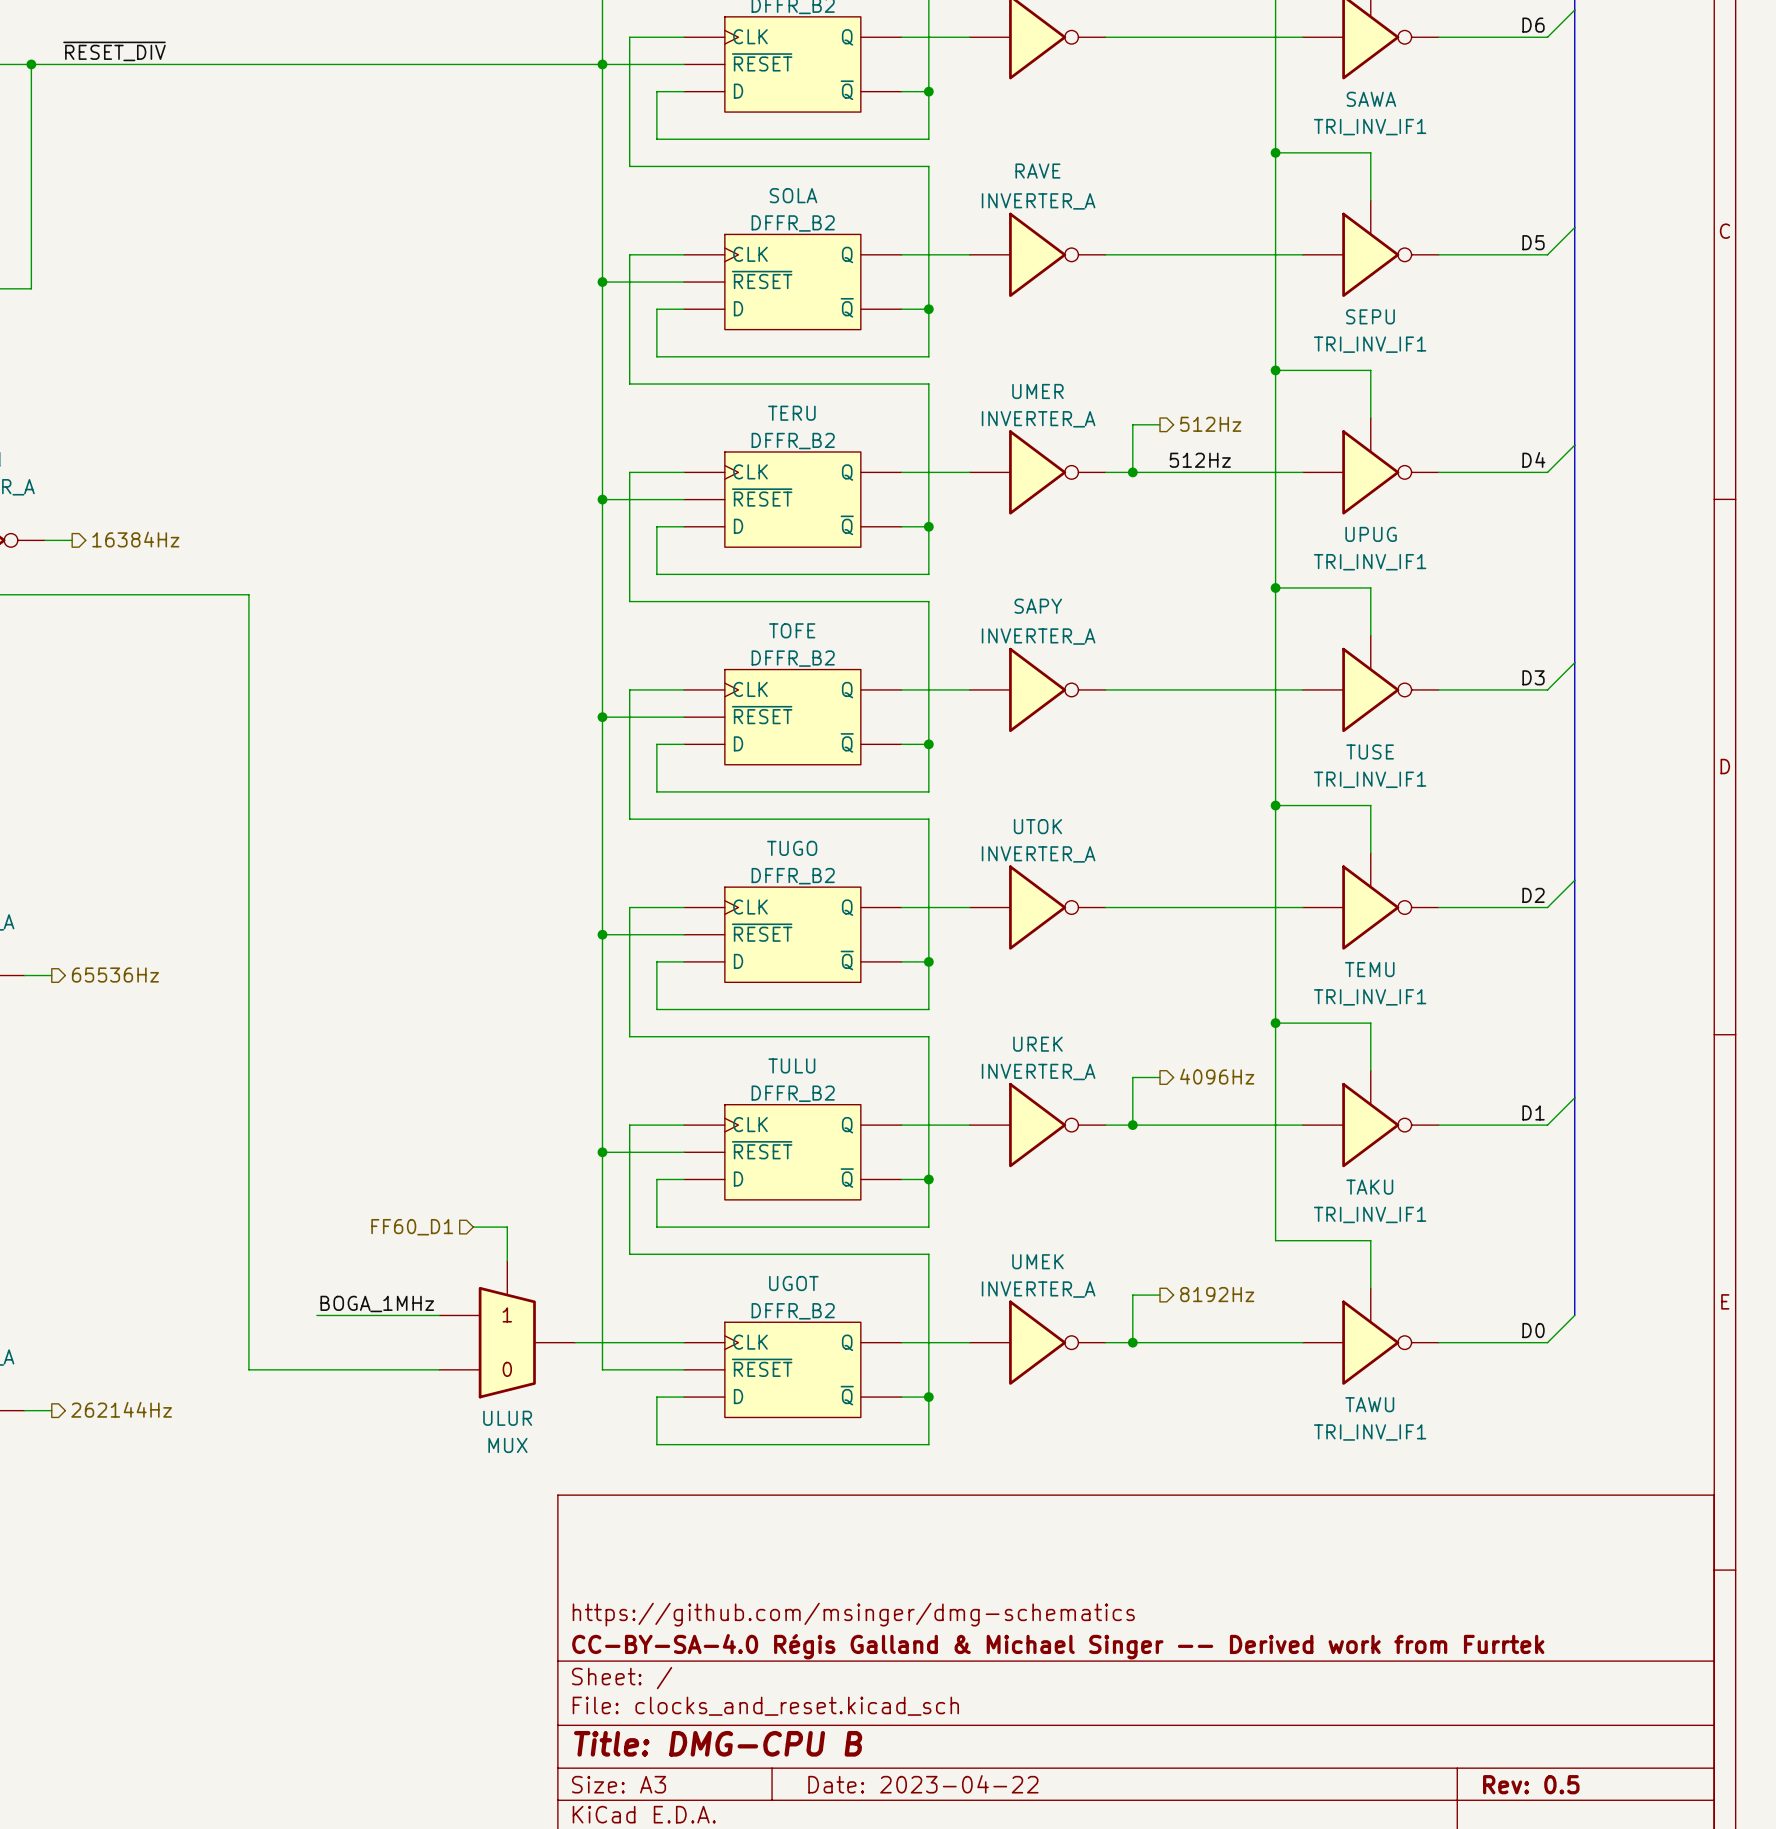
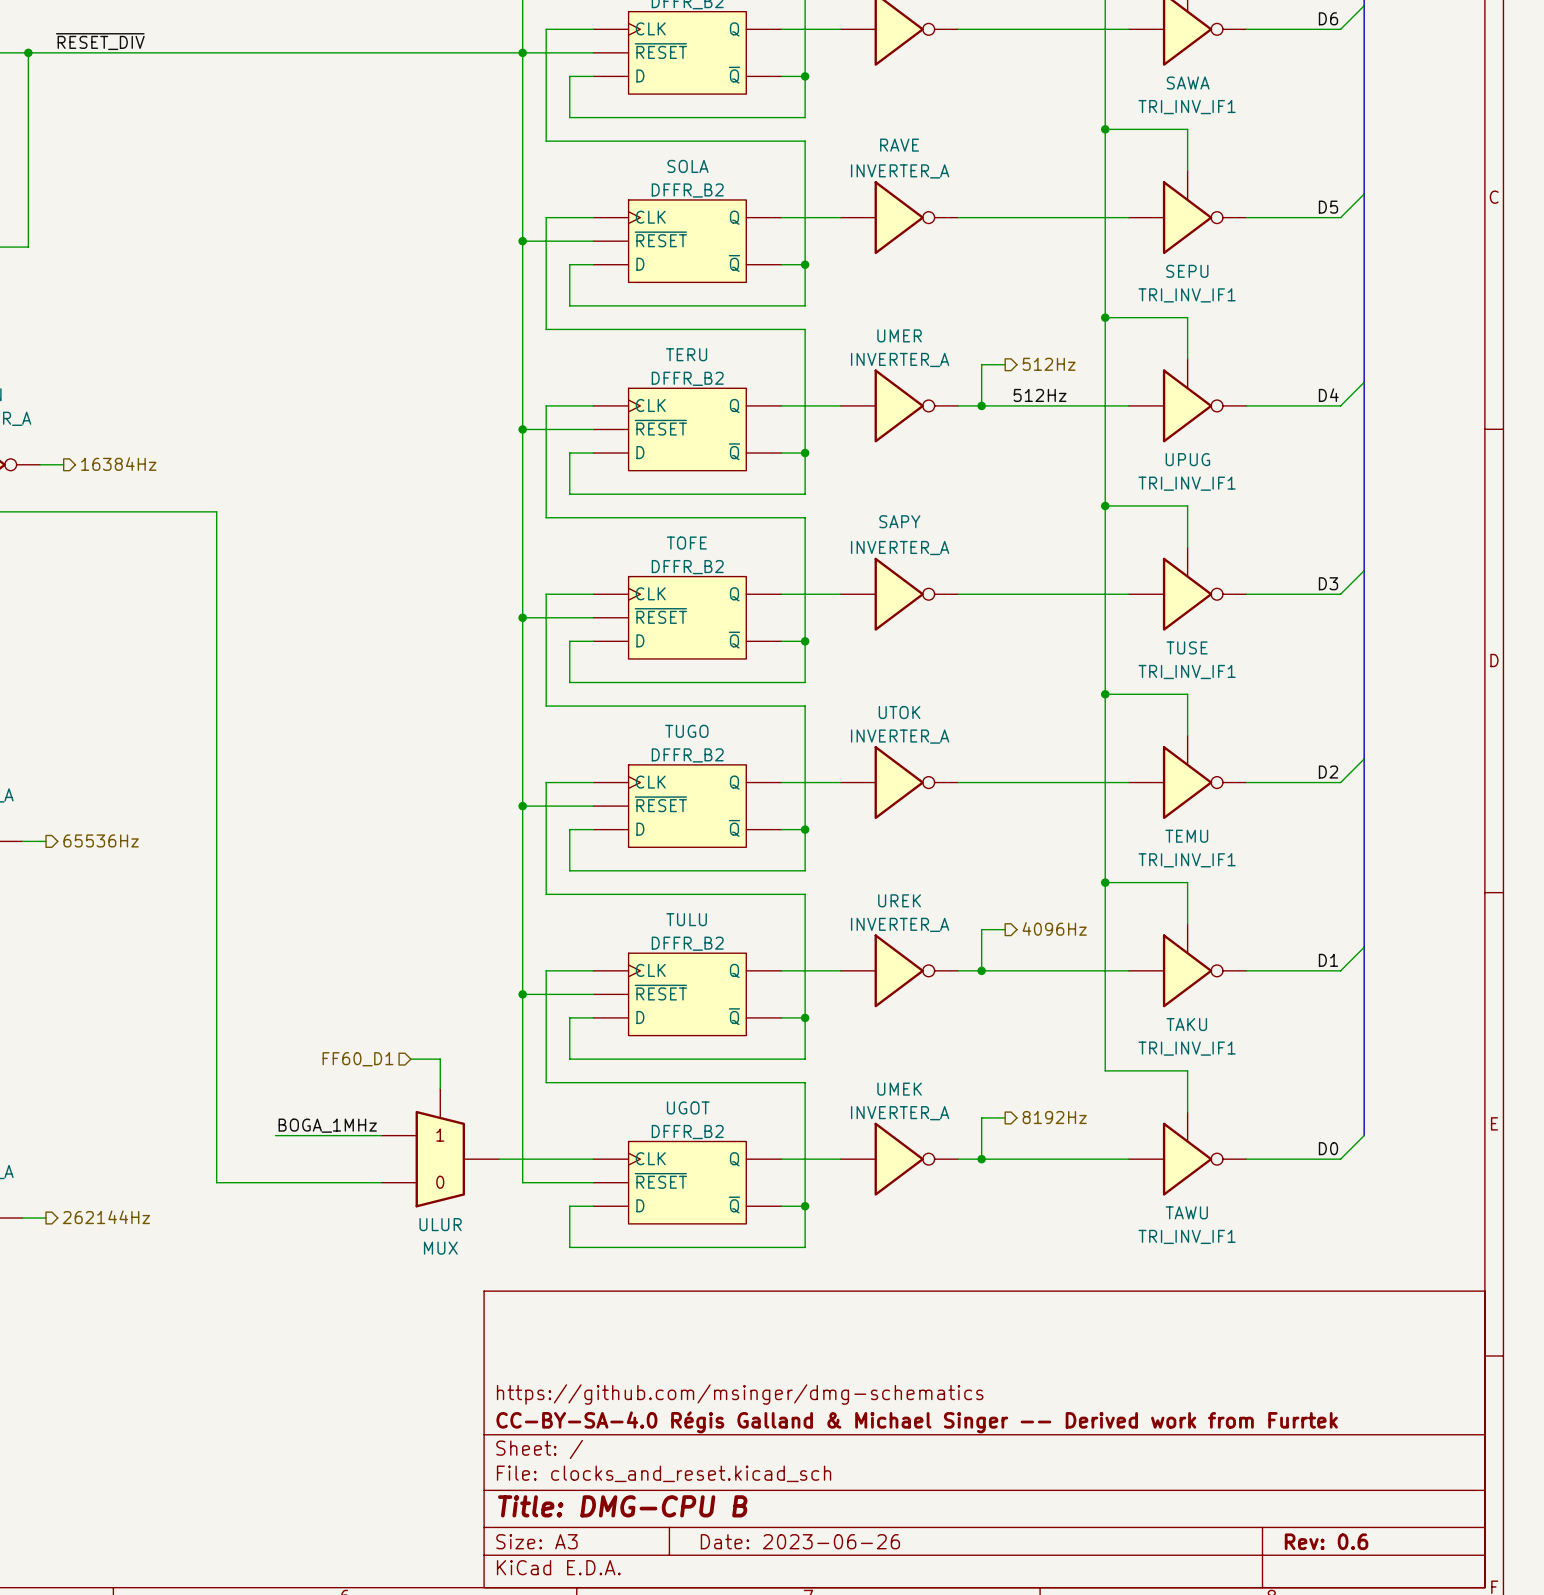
title block: Date: 2023-04-22 (923, 1784) -> Date: 2023-06-26 (800, 1541)
title block: Rev: 0.5 (1531, 1784) -> Rev: 0.6 (1326, 1541)

